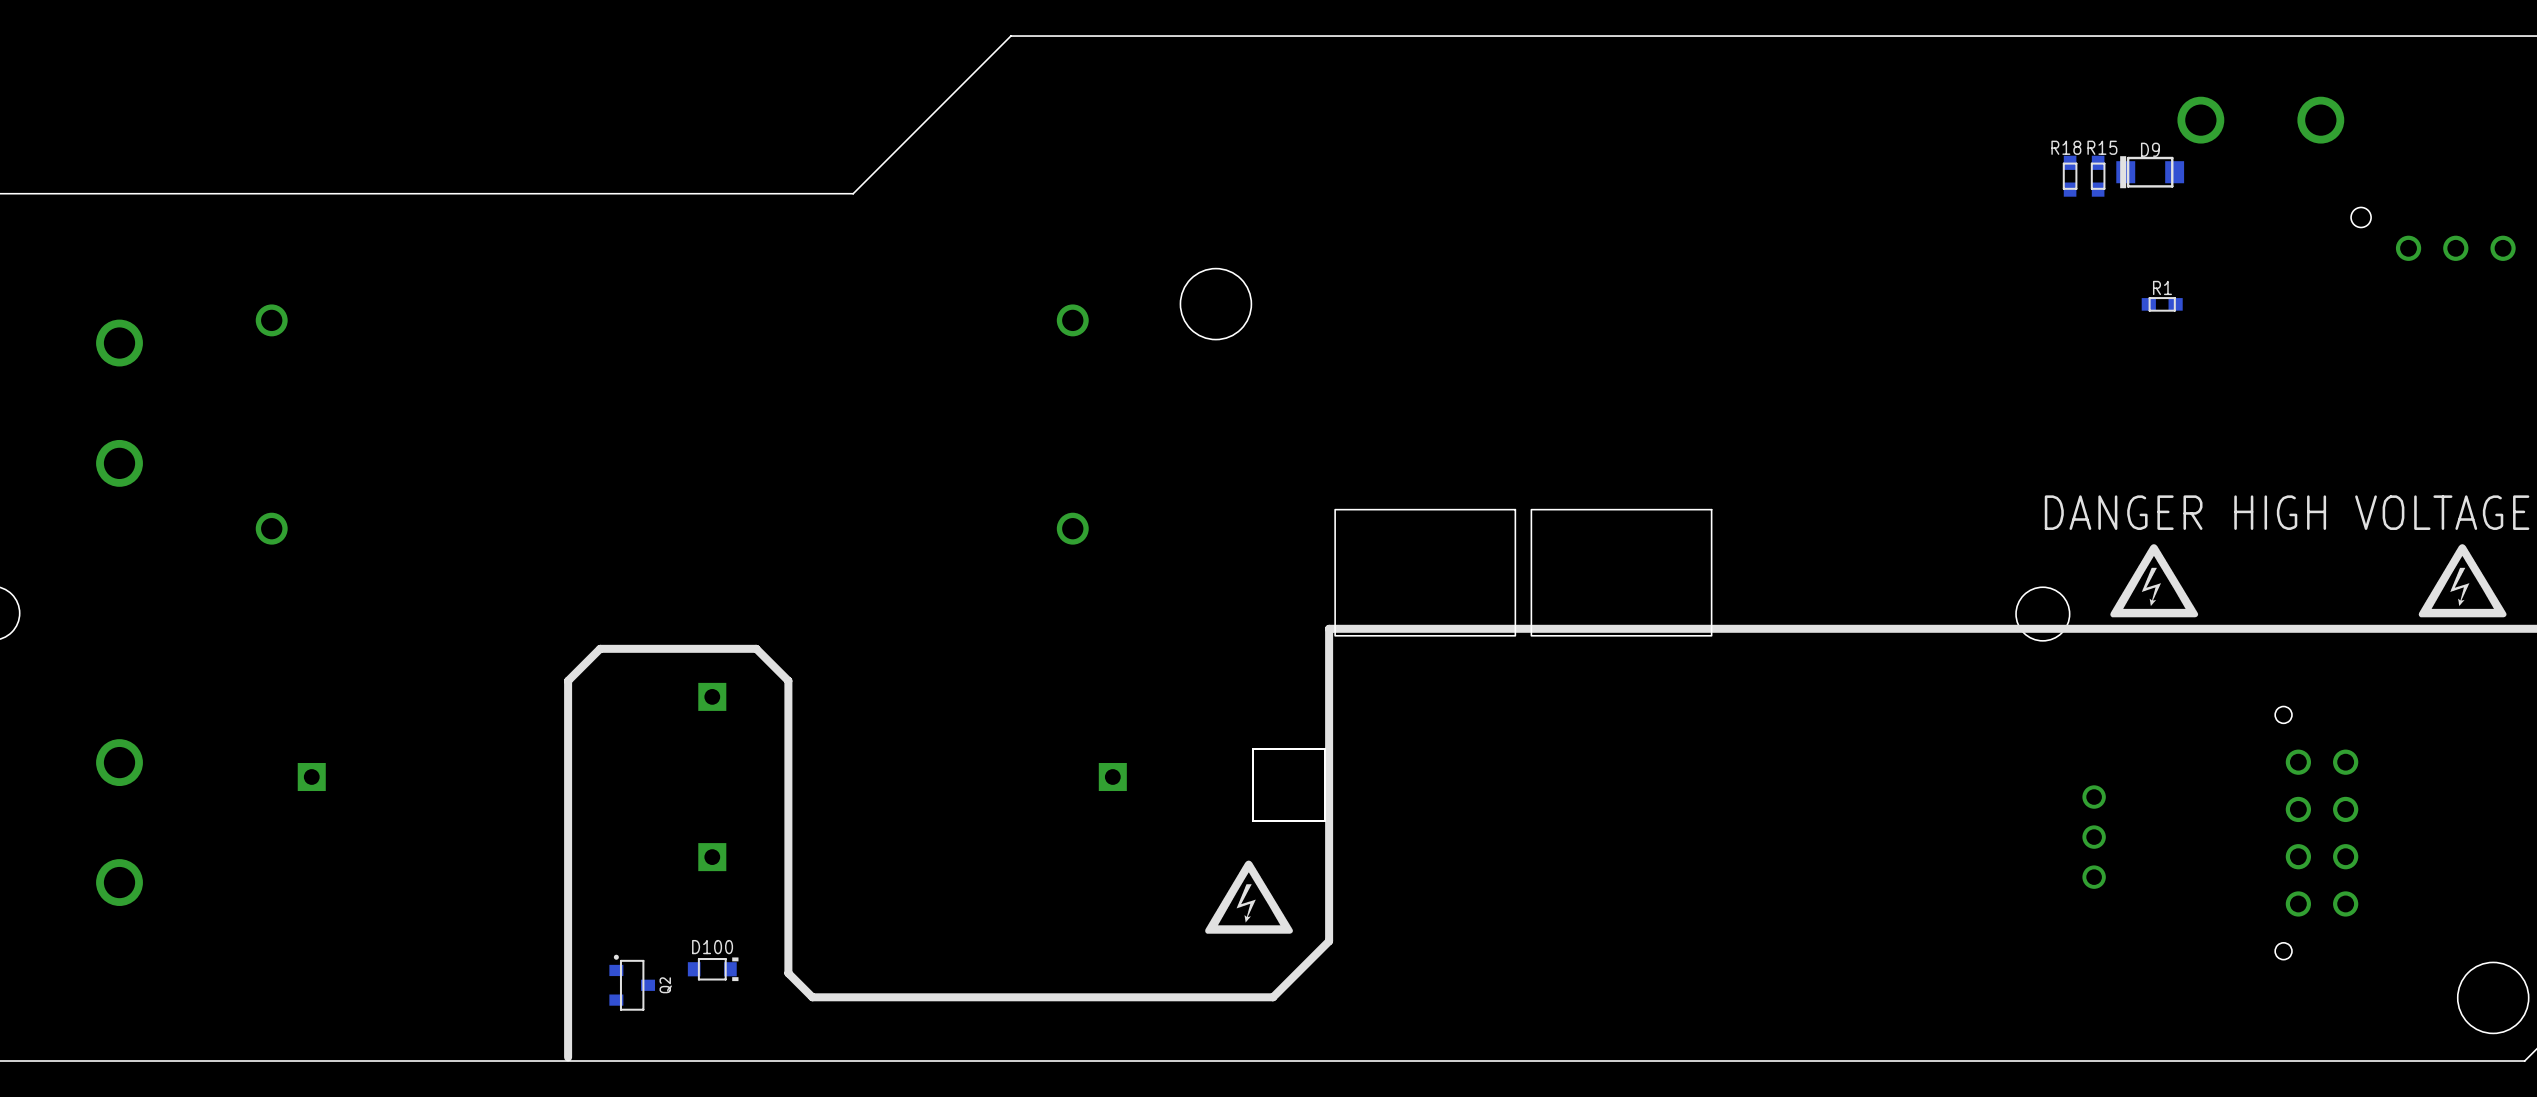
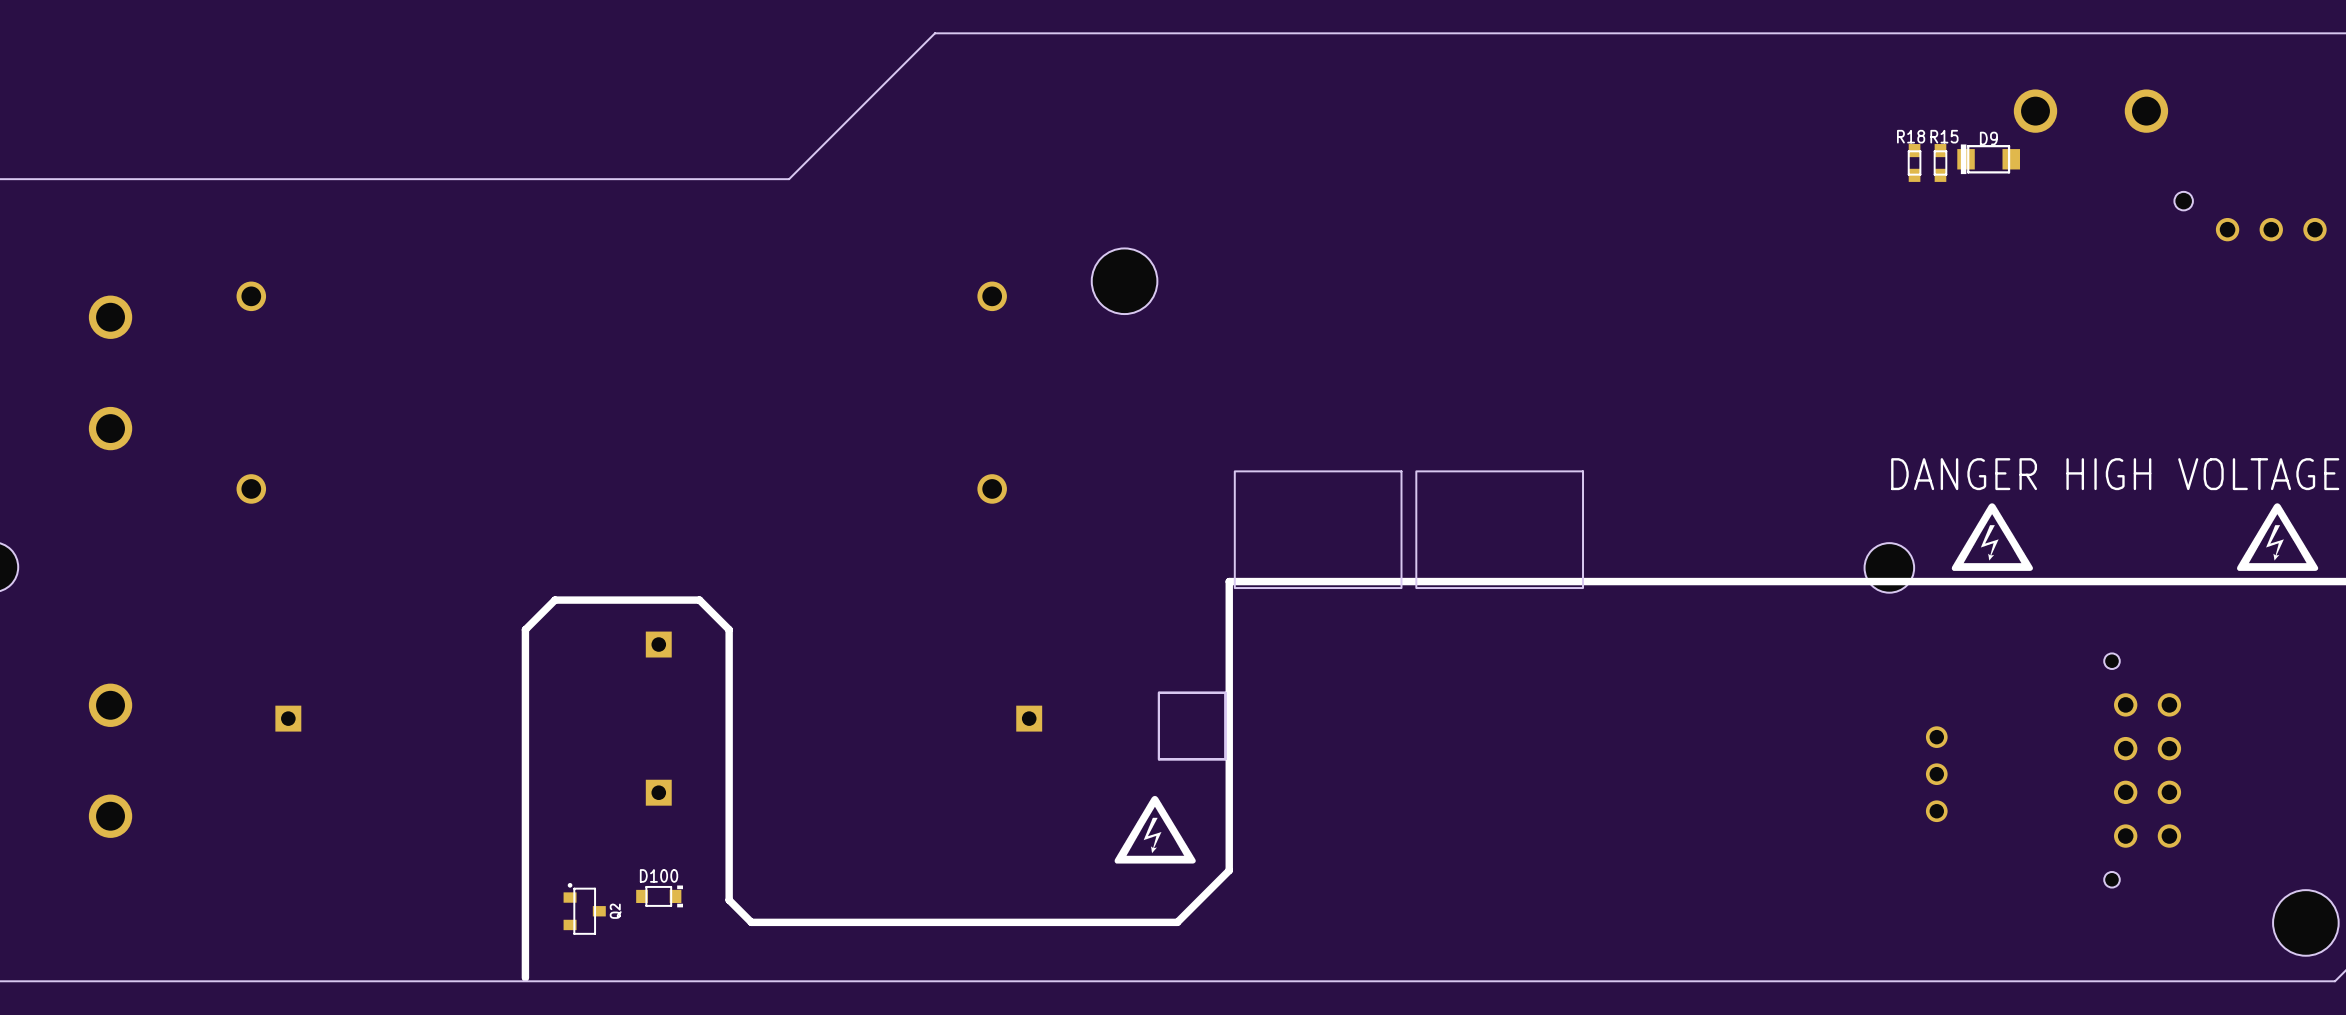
R1: (2162, 304) -> none

